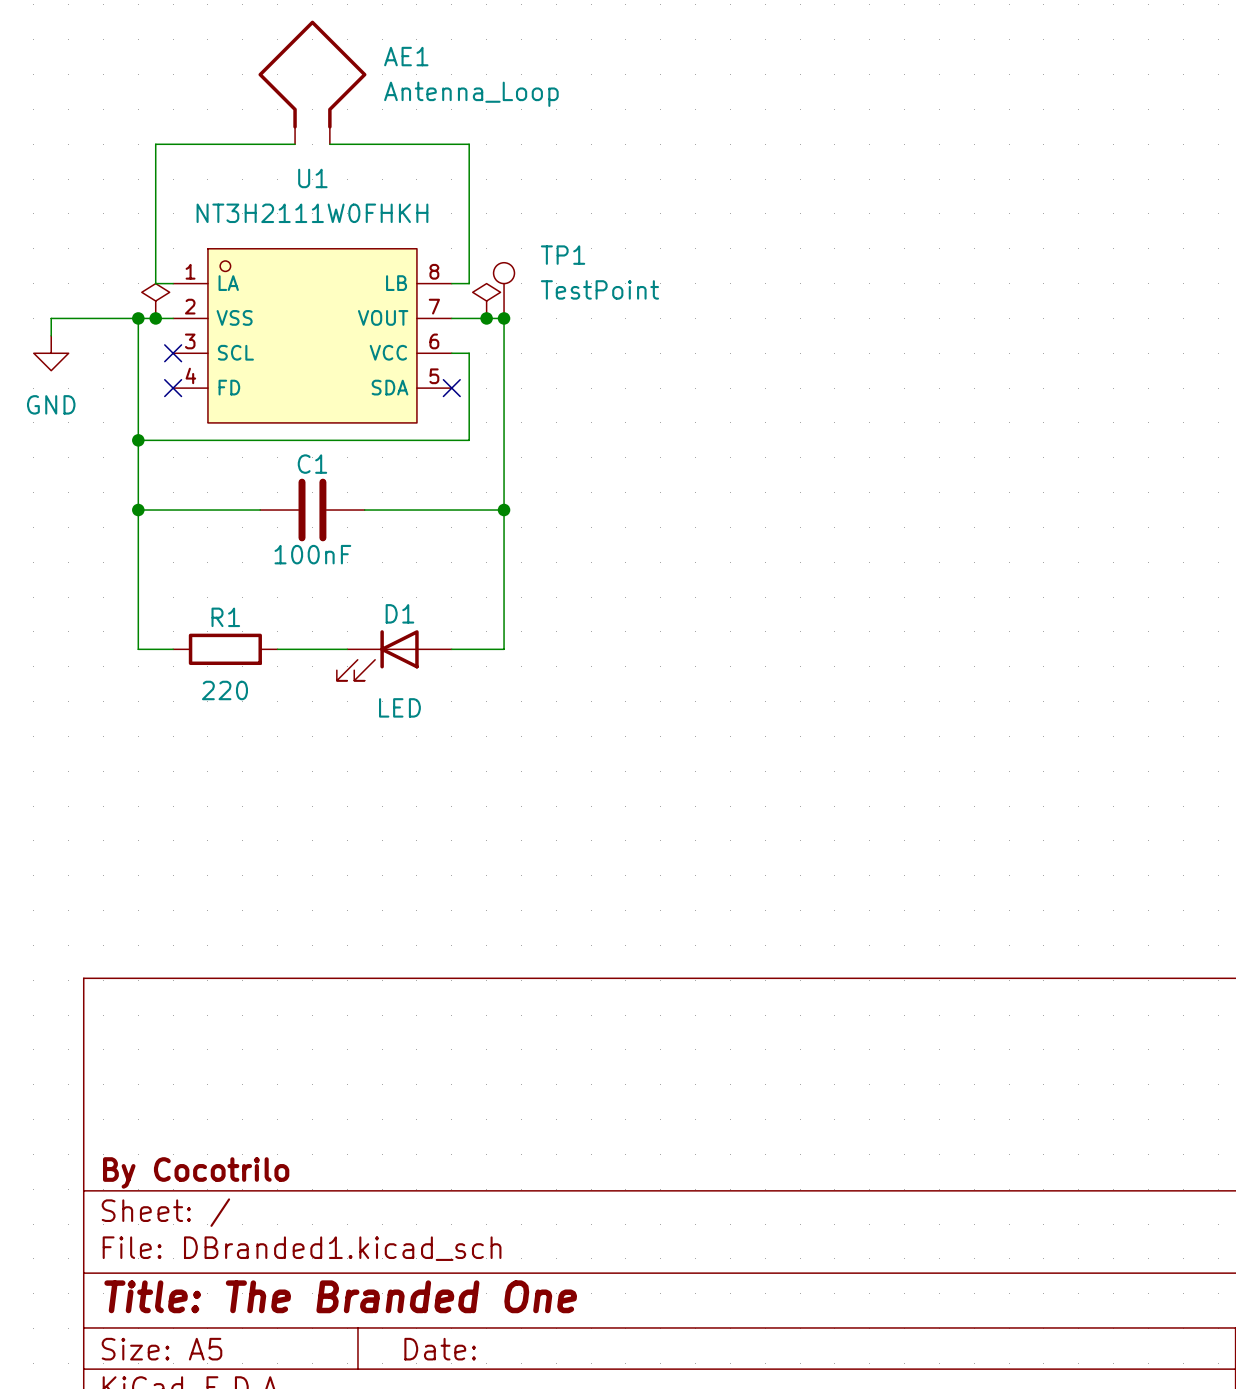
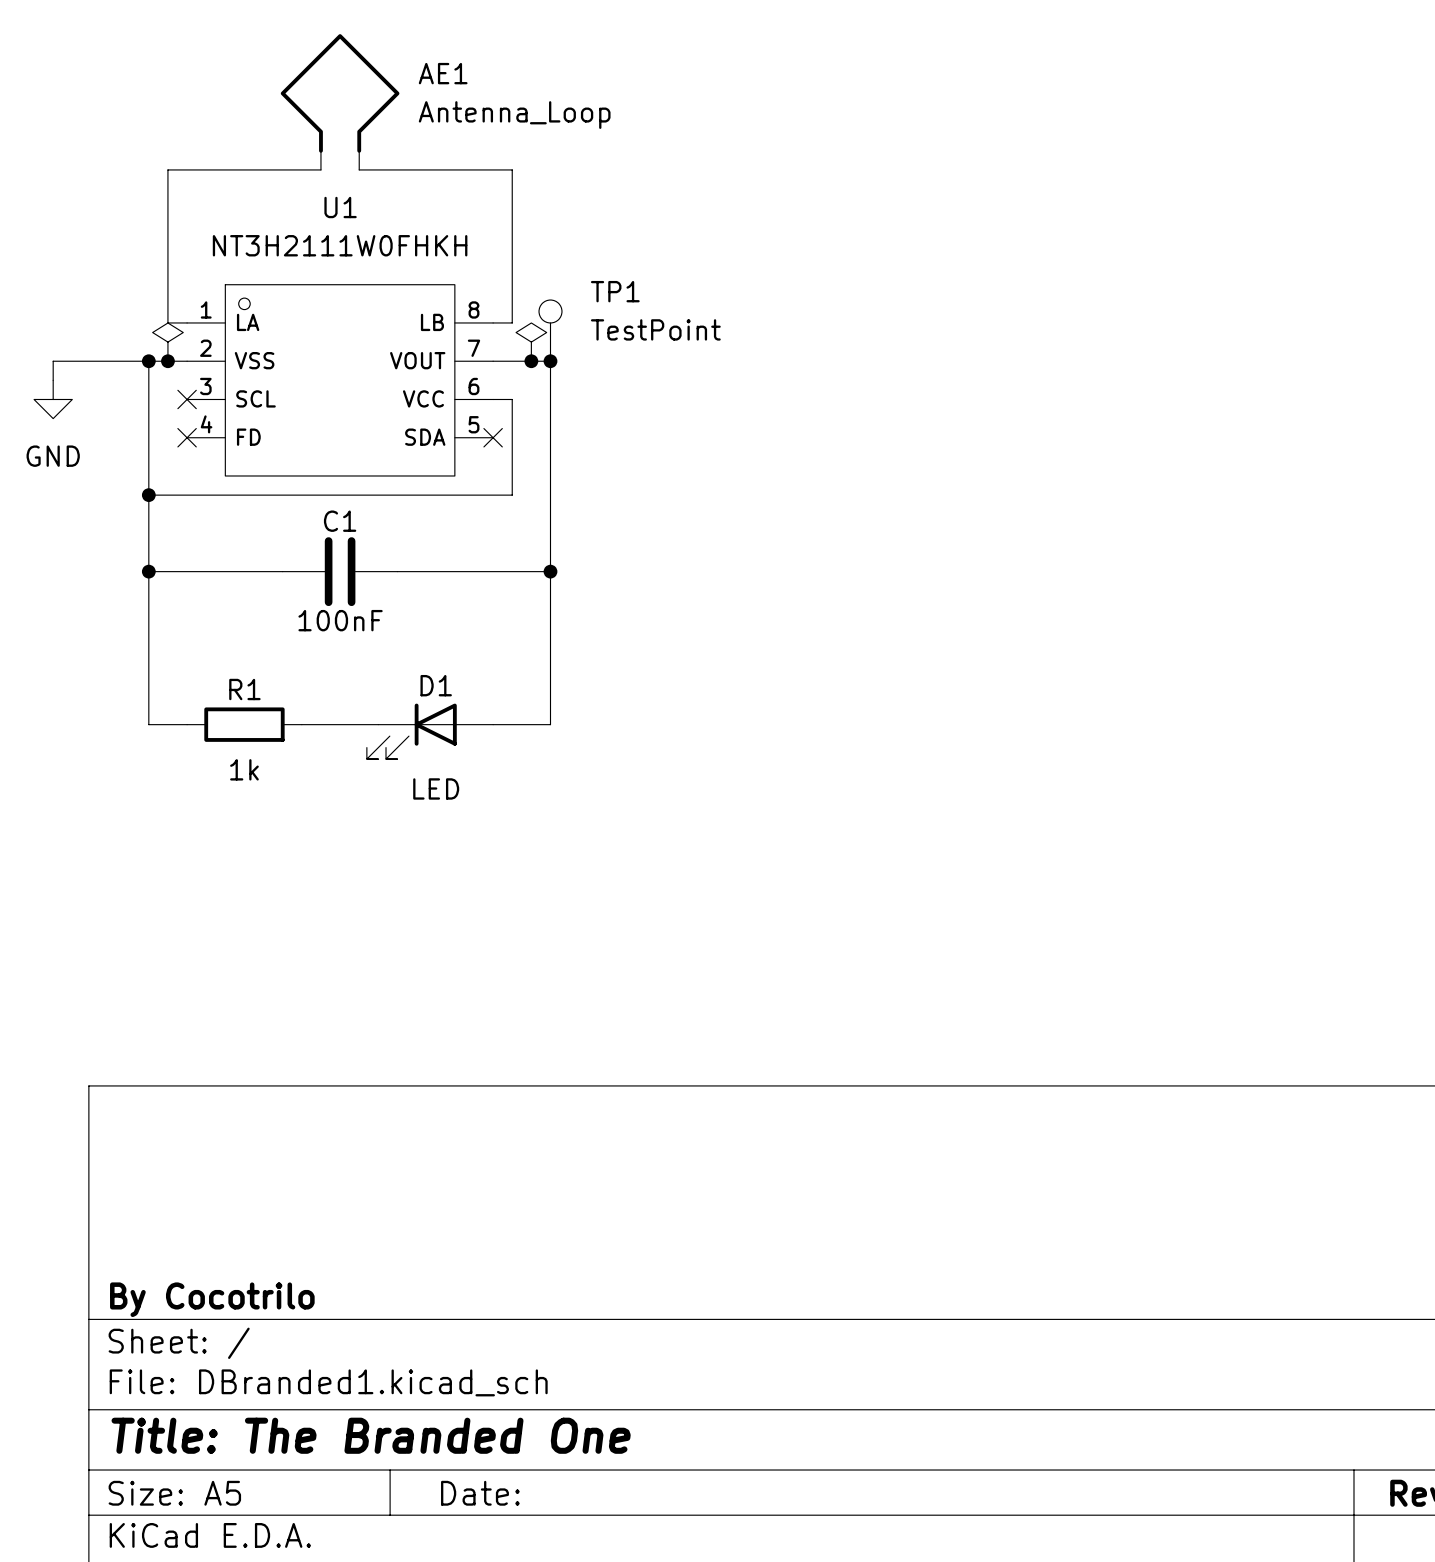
R1 value: 220 (224, 690) -> 1k (244, 769)

